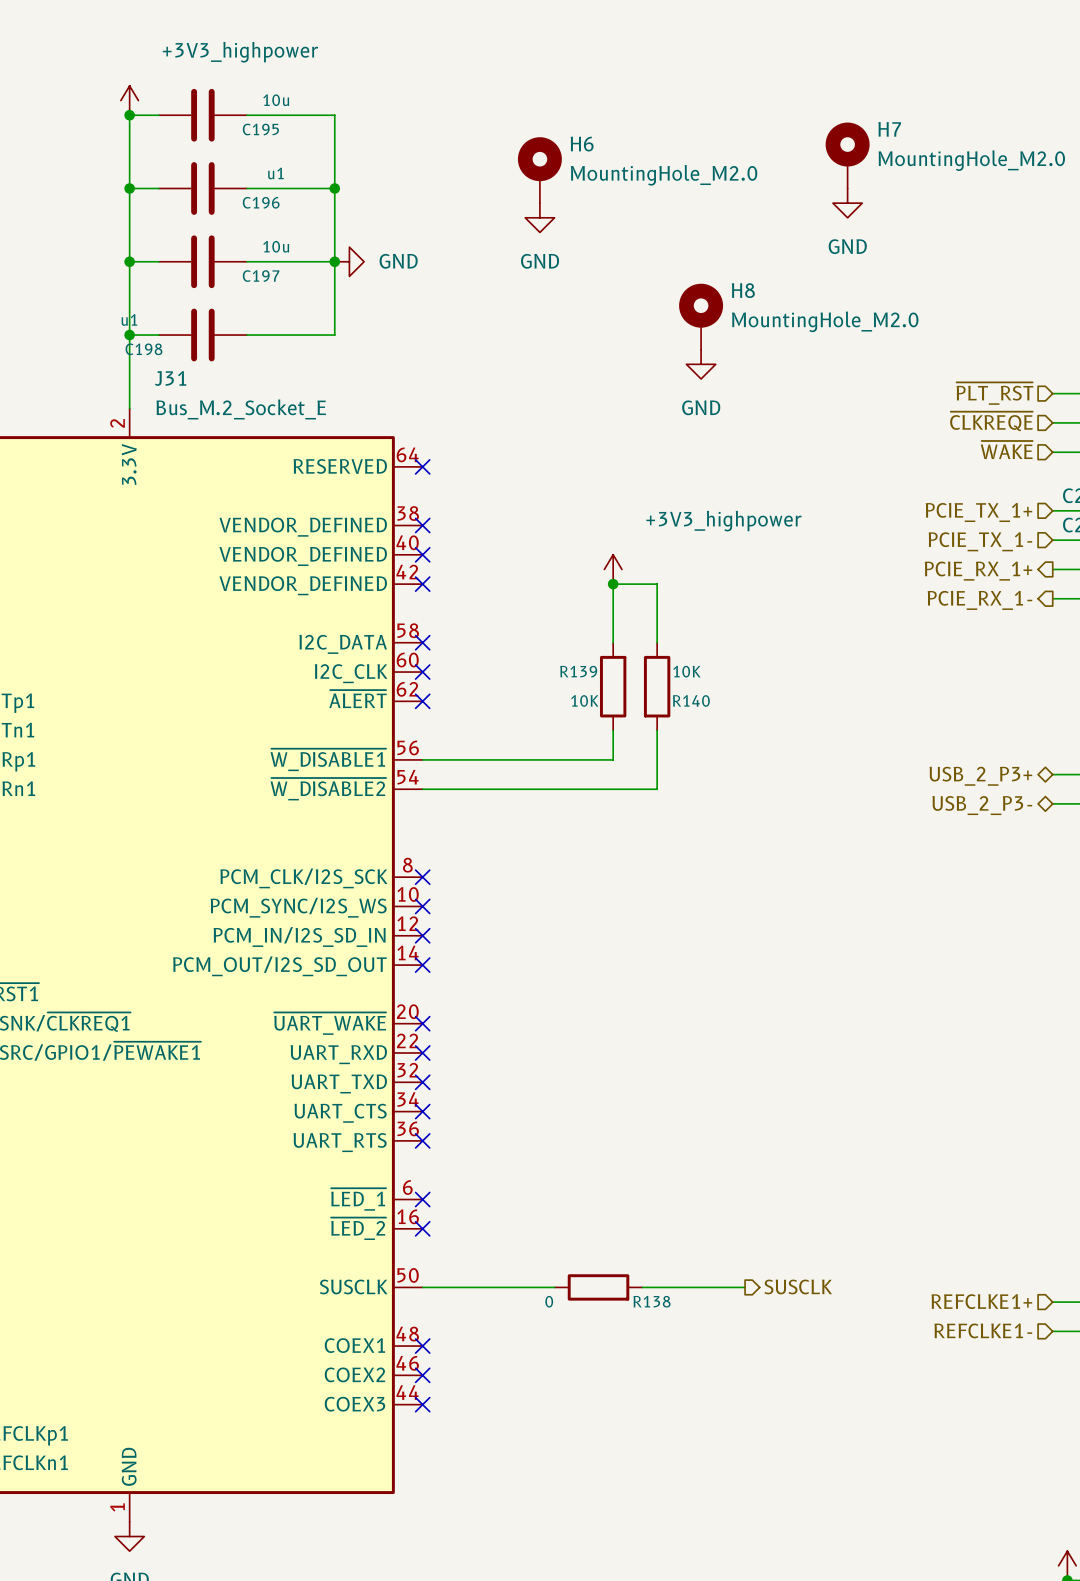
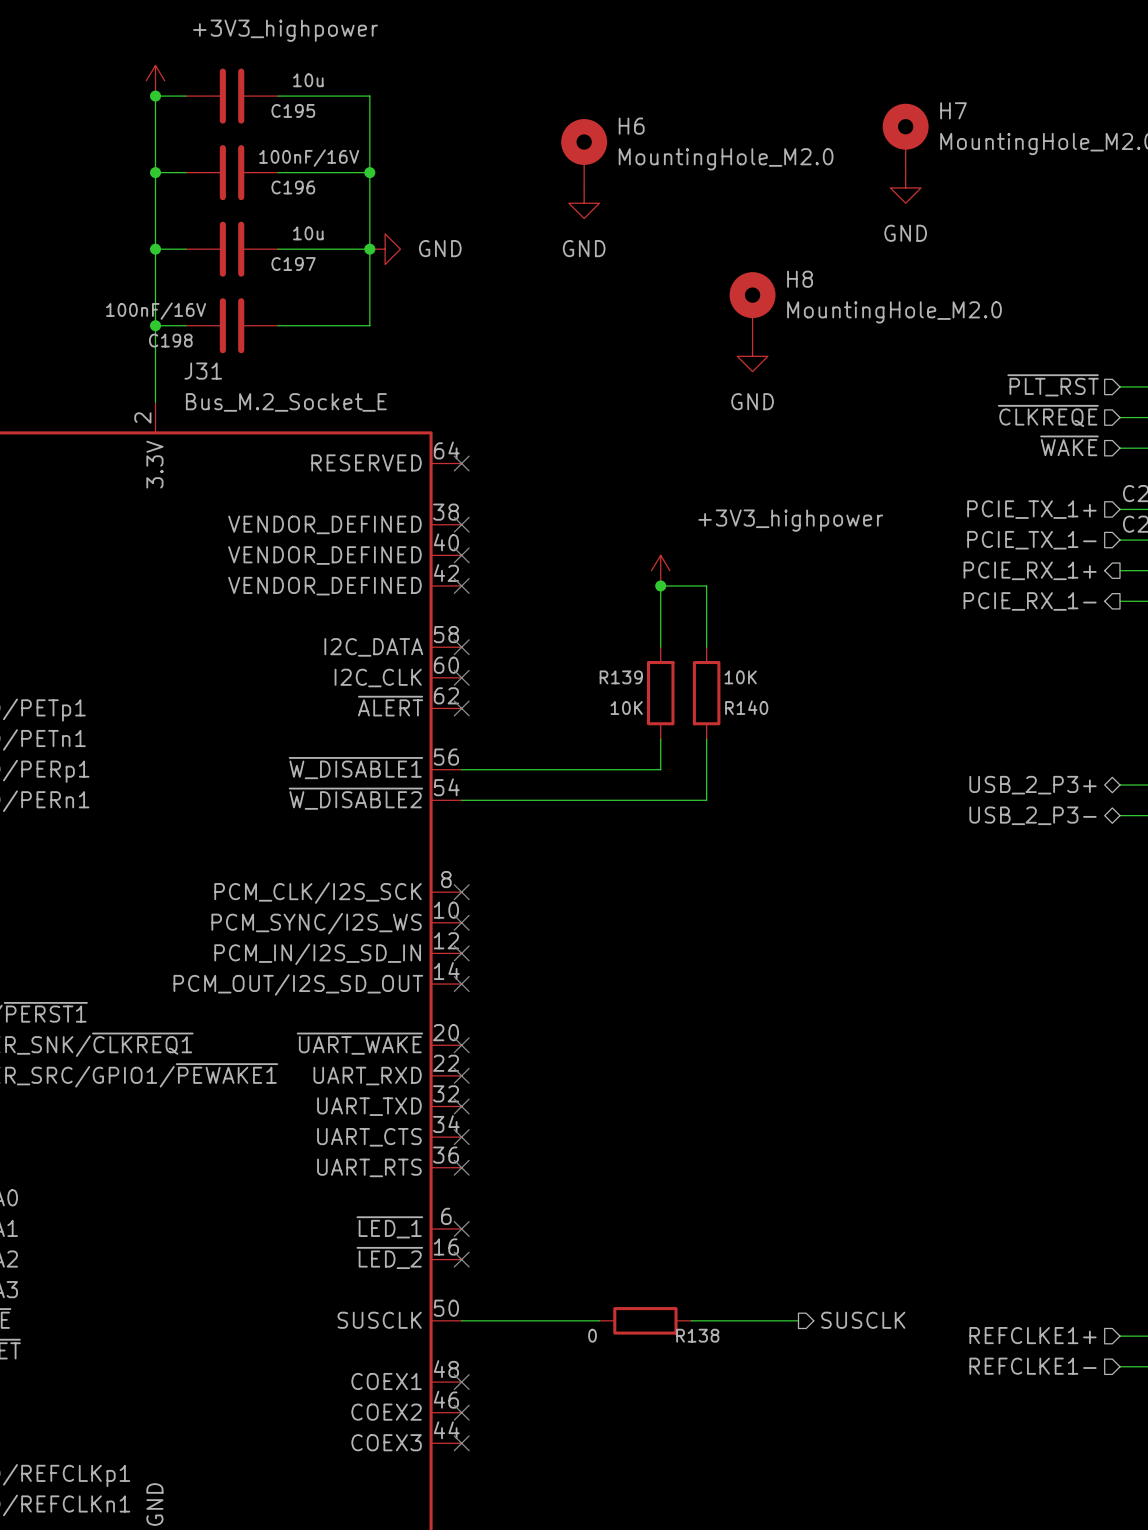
C196 value: u1 (275, 173) -> 100nF/16V (309, 158)
C198 value: u1 (129, 320) -> 100nF/16V (156, 311)

